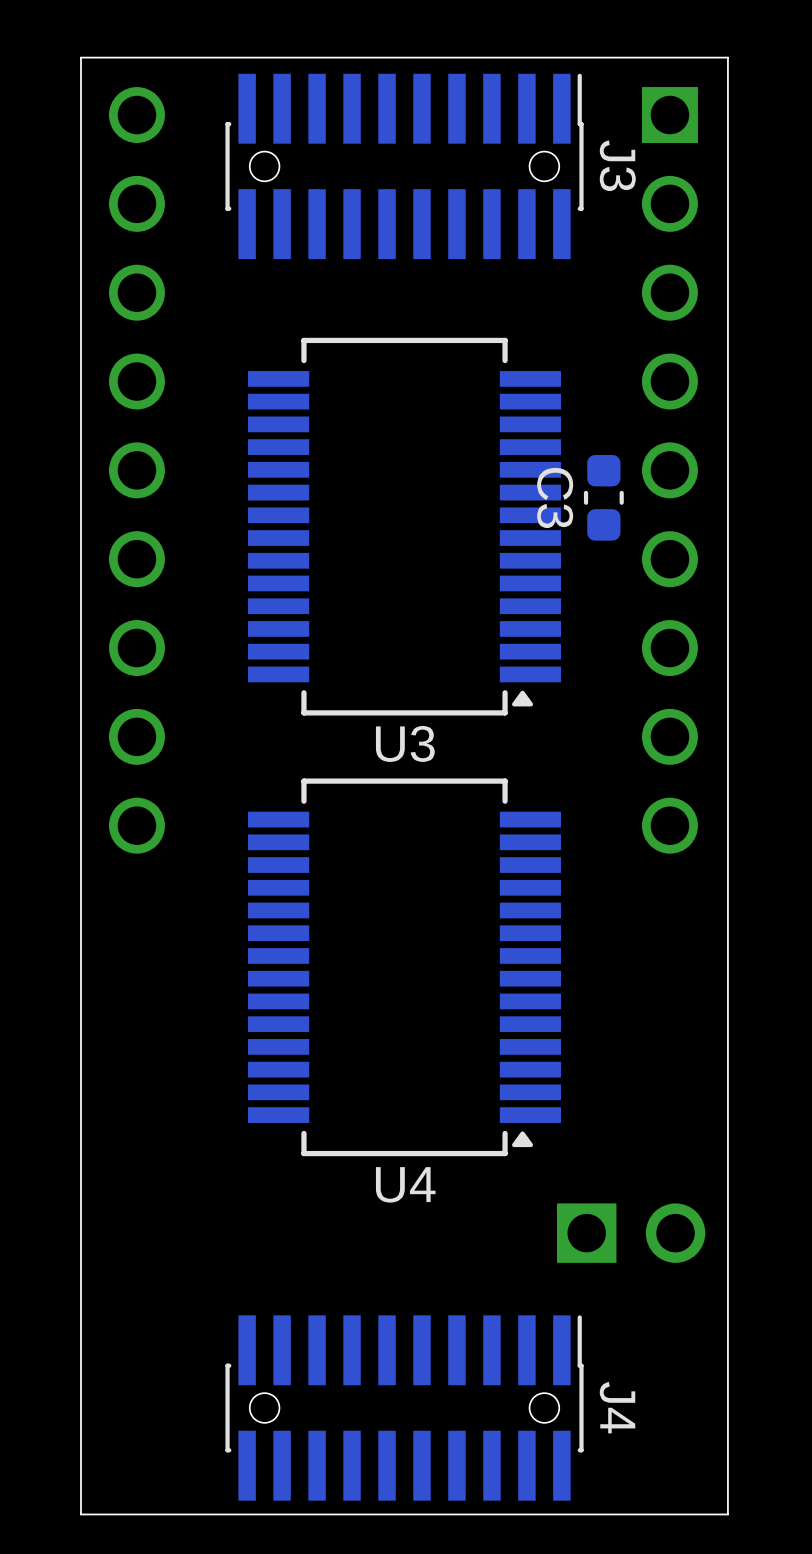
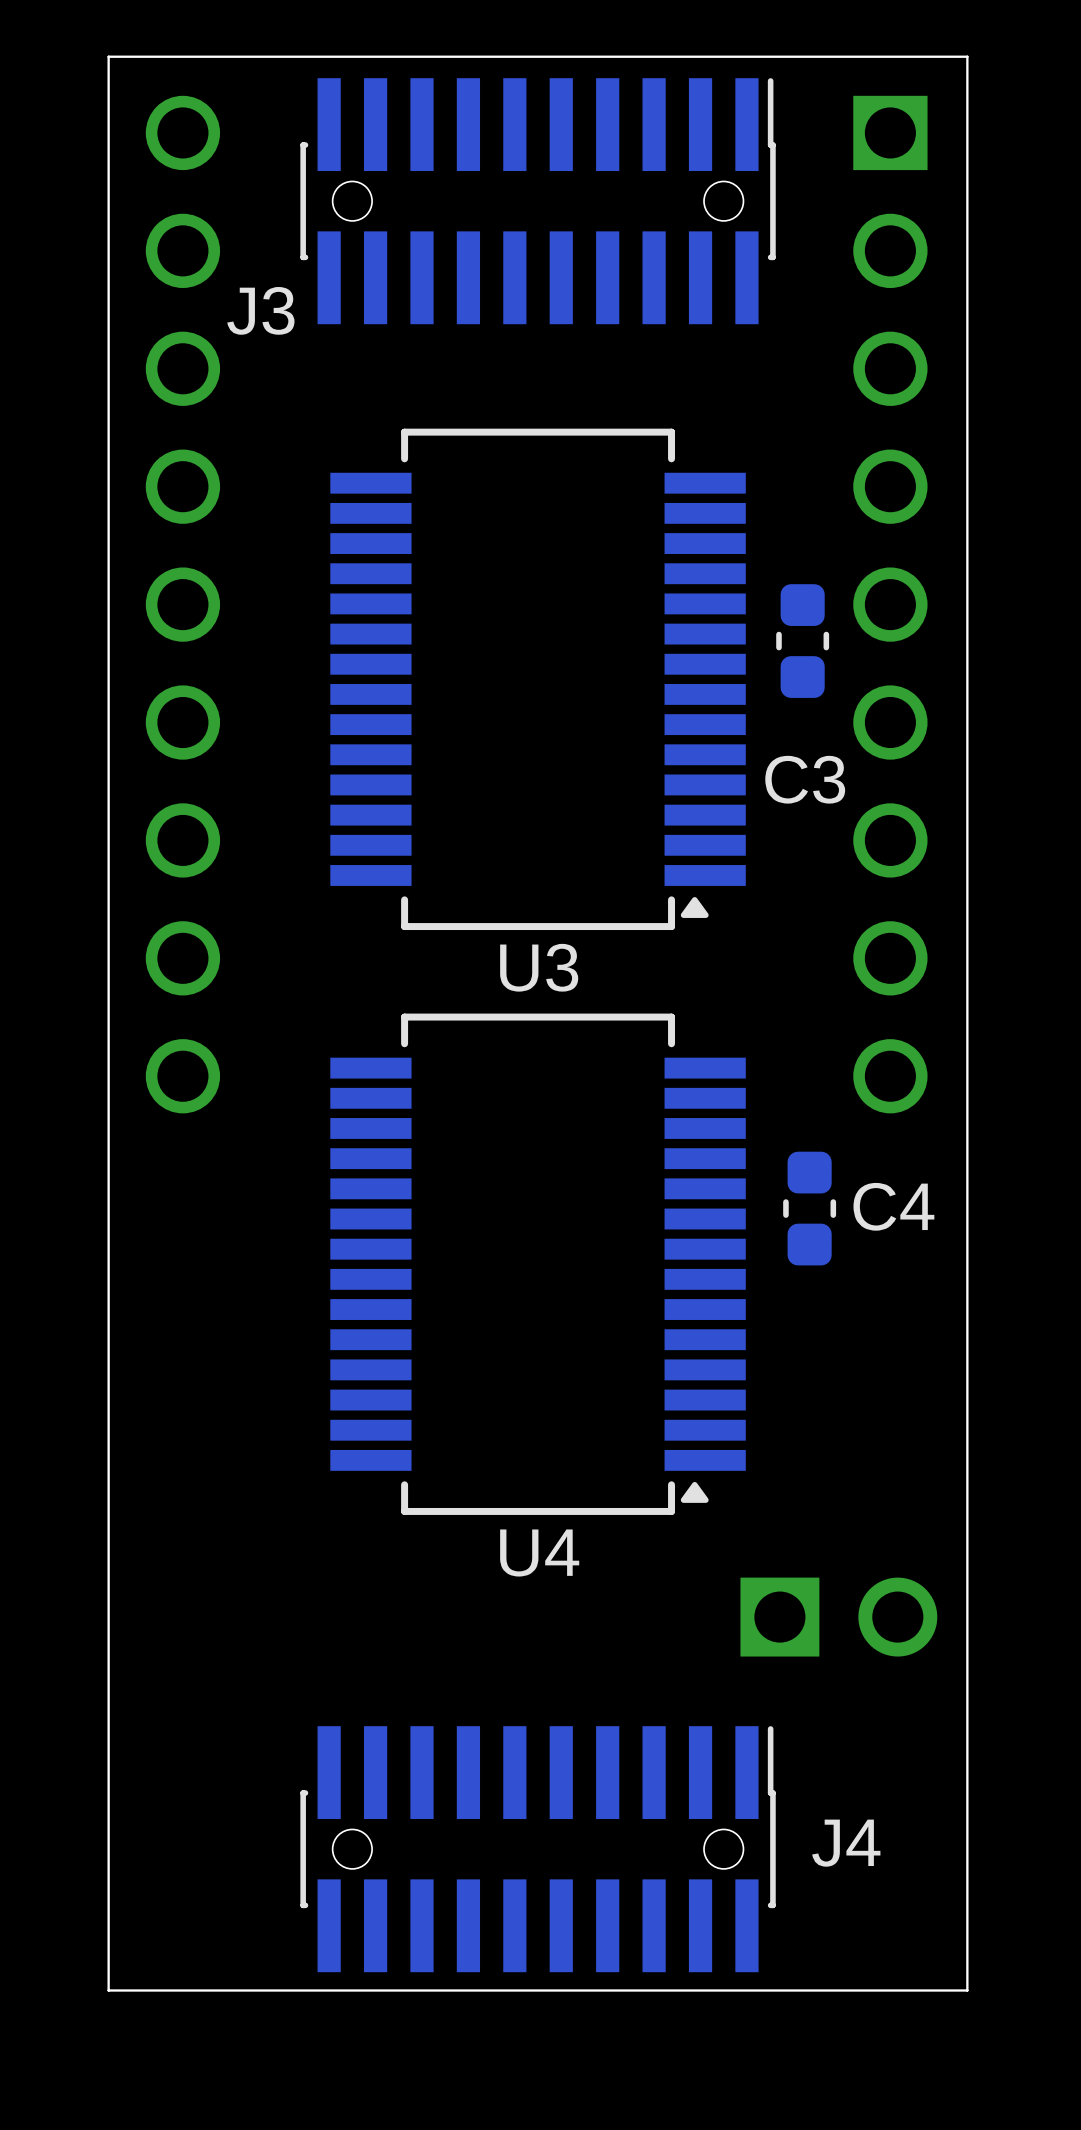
J3 name rotation: 0° (617, 165) -> 90° counterclockwise (260, 310)
J3 name position: J3 (617, 165) -> J3 (260, 310)
C3 name rotation: 0° (555, 497) -> 90° counterclockwise (805, 779)
C3 name position: C3 (555, 497) -> C3 (805, 779)
C4: none -> (809, 1208)
J4 name rotation: 0° (617, 1407) -> 90° counterclockwise (846, 1843)

